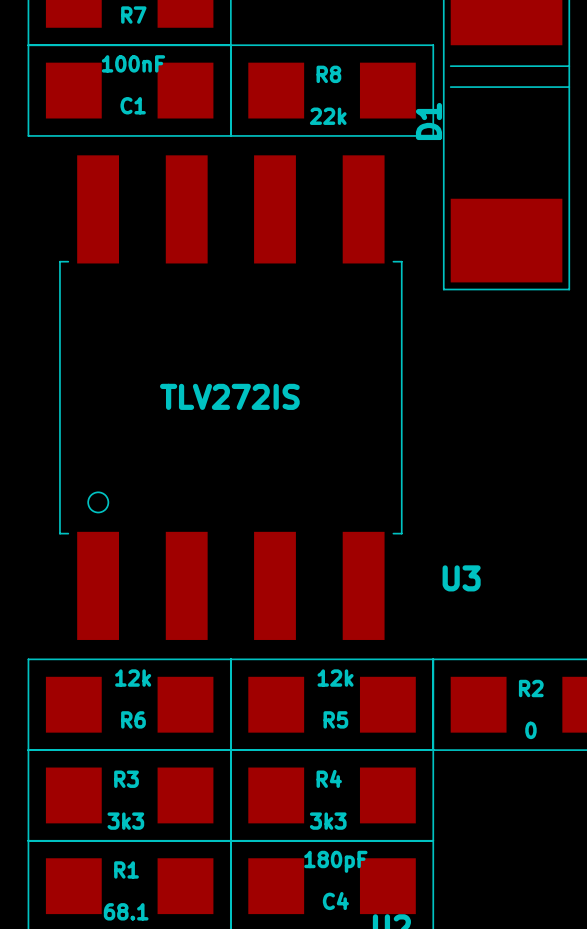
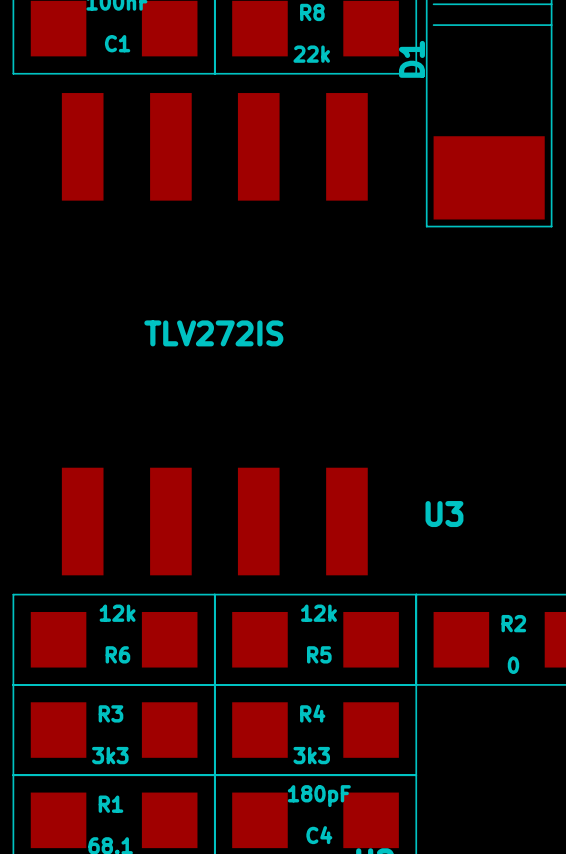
U3 footprint: [59, 155, 403, 640] -> [61, 93, 368, 576]

